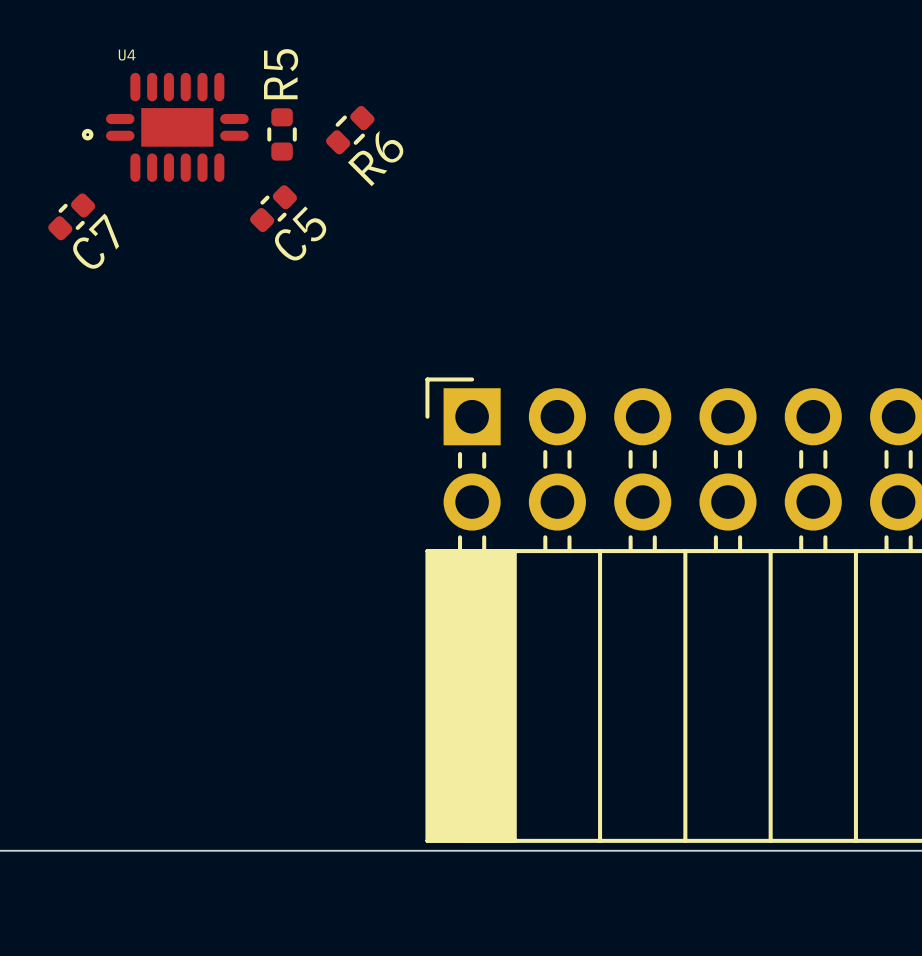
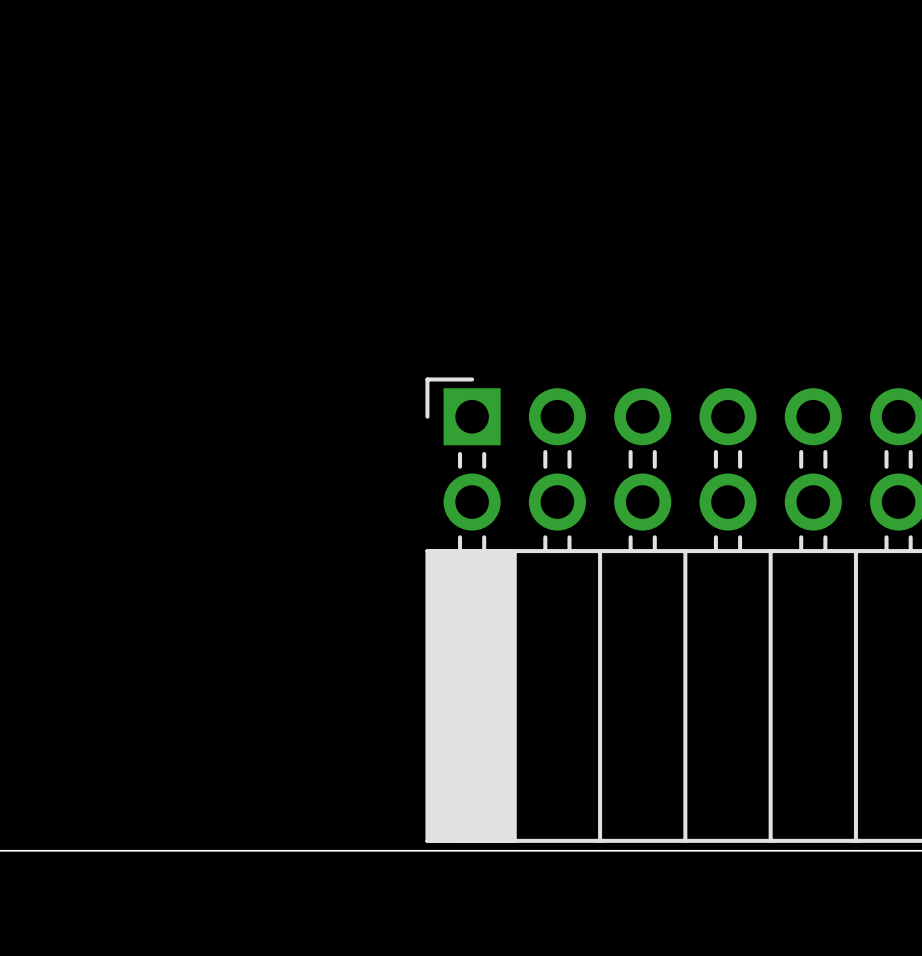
U4: (165, 127) -> none
R6: (350, 130) -> none
R5: (282, 134) -> none
C5: (273, 208) -> none
C7: (71, 216) -> none

